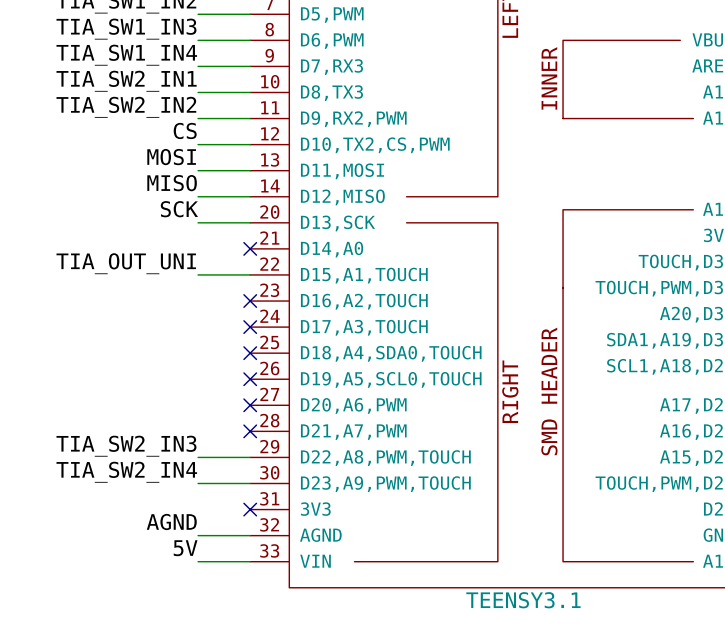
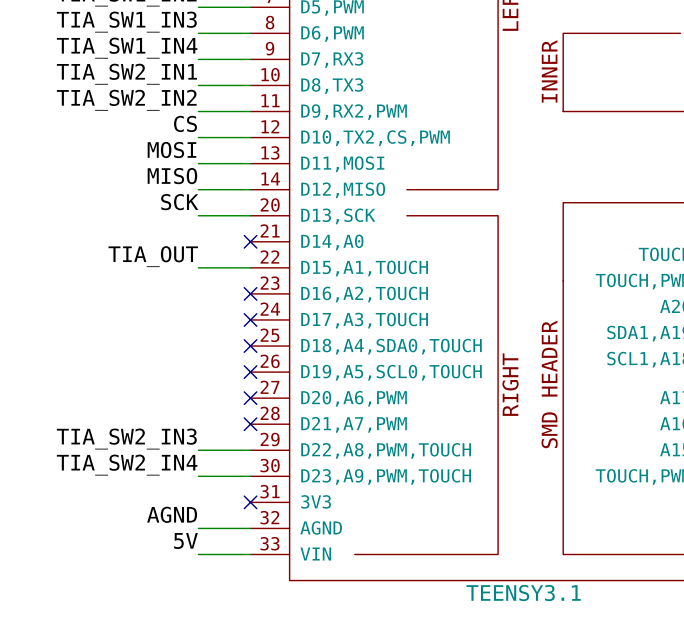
label: TIA_OUT_UNI (126, 263) -> TIA_OUT (153, 256)

